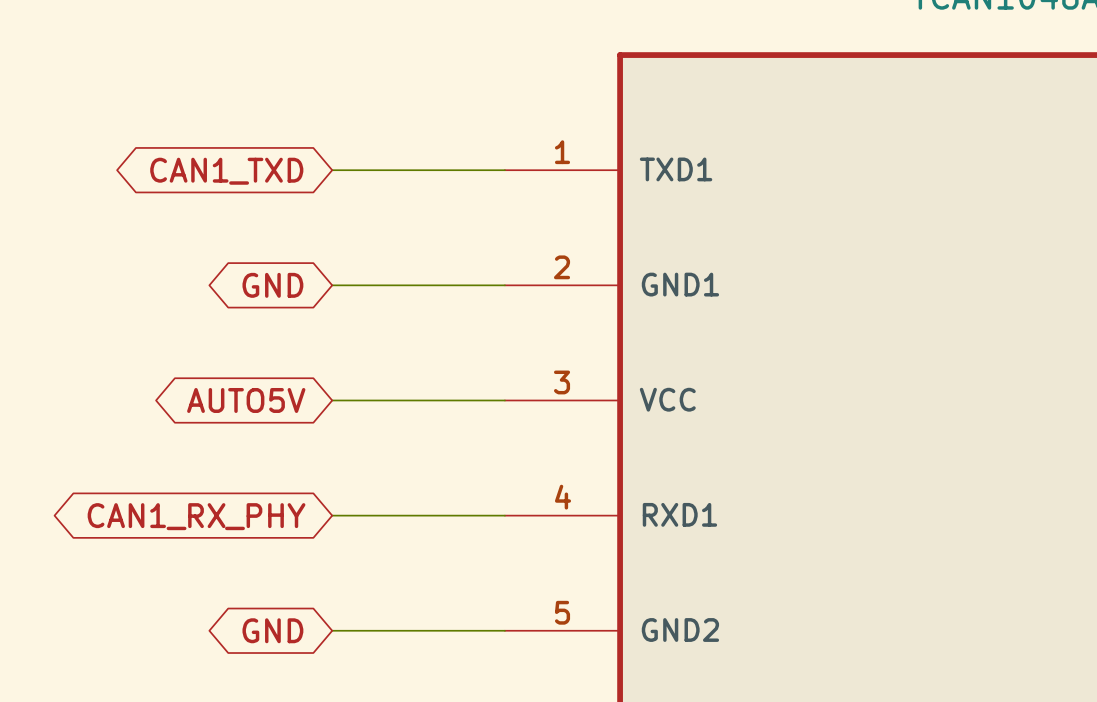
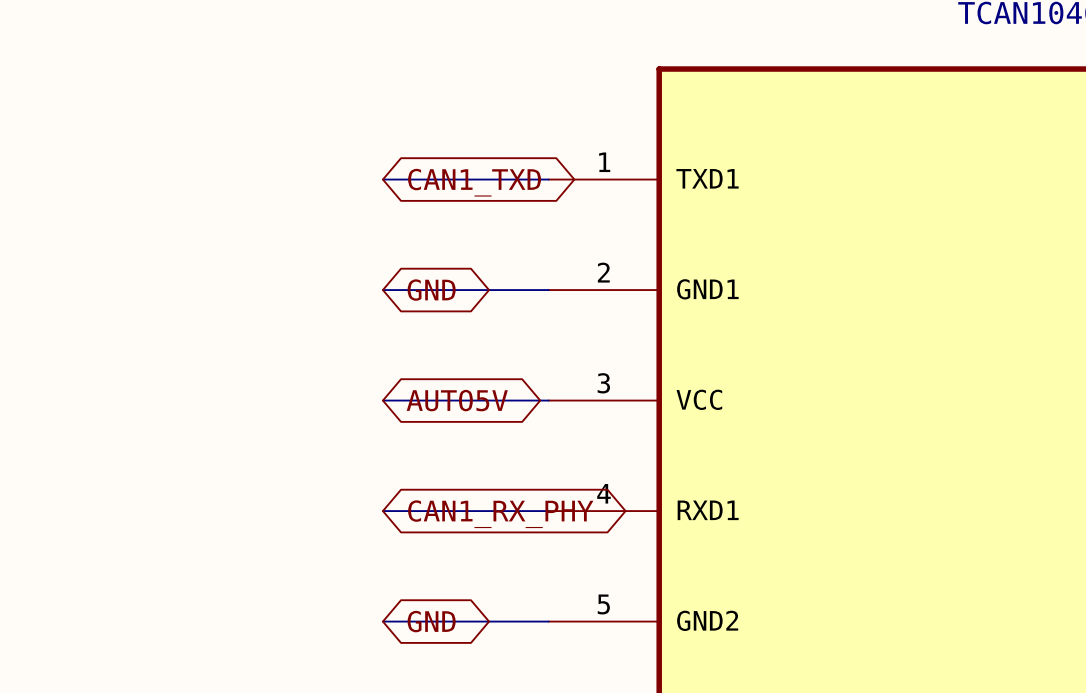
global label rotation: 0° (226, 171) -> 180° (474, 182)
global label position: CAN1_TXD (226, 171) -> CAN1_TXD (474, 182)
global label rotation: 0° (272, 285) -> 180° (431, 290)
global label position: GND (272, 285) -> GND (431, 290)
global label rotation: 0° (246, 400) -> 180° (457, 400)
global label rotation: 0° (196, 516) -> 180° (500, 514)
global label rotation: 0° (272, 630) -> 180° (431, 621)
global label position: GND (272, 630) -> GND (431, 621)

